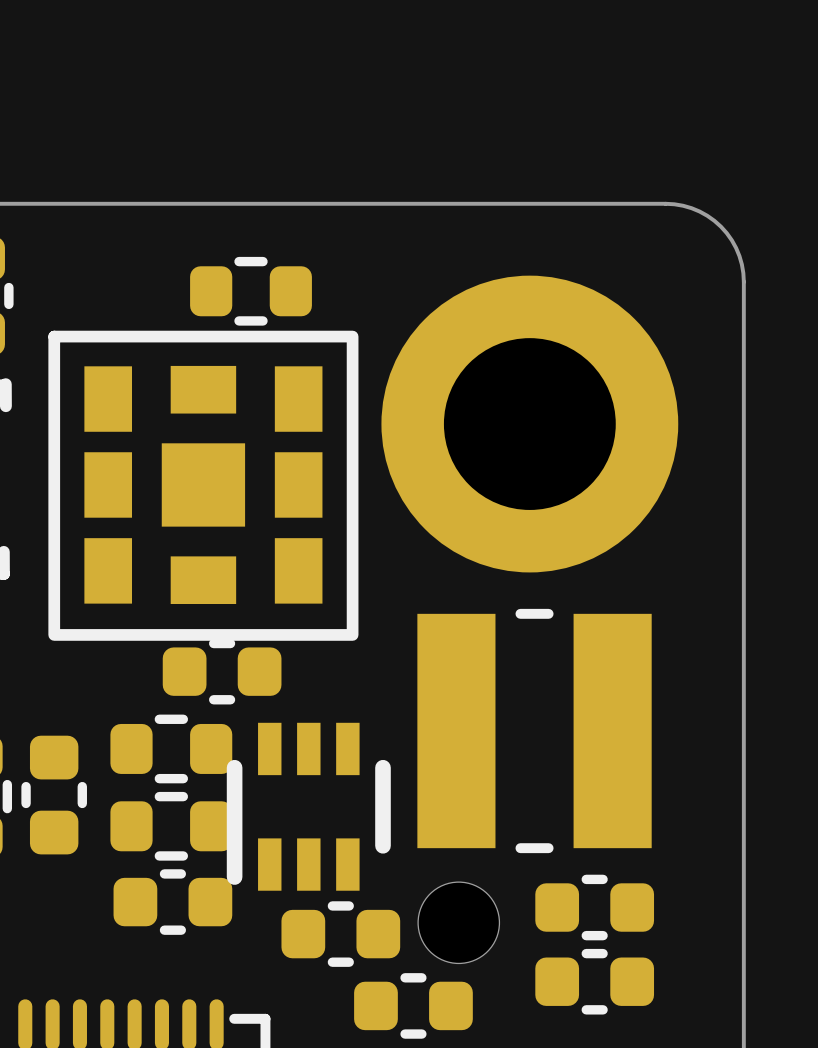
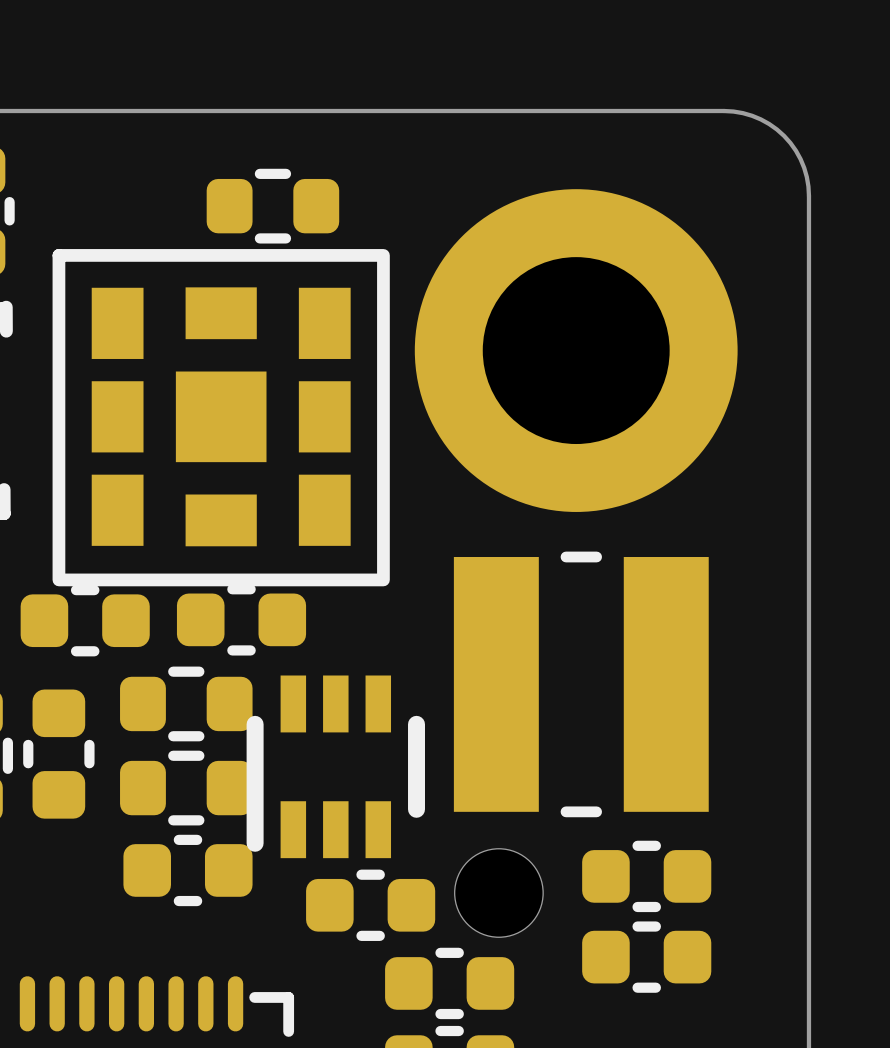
part: none -> (85, 620)

